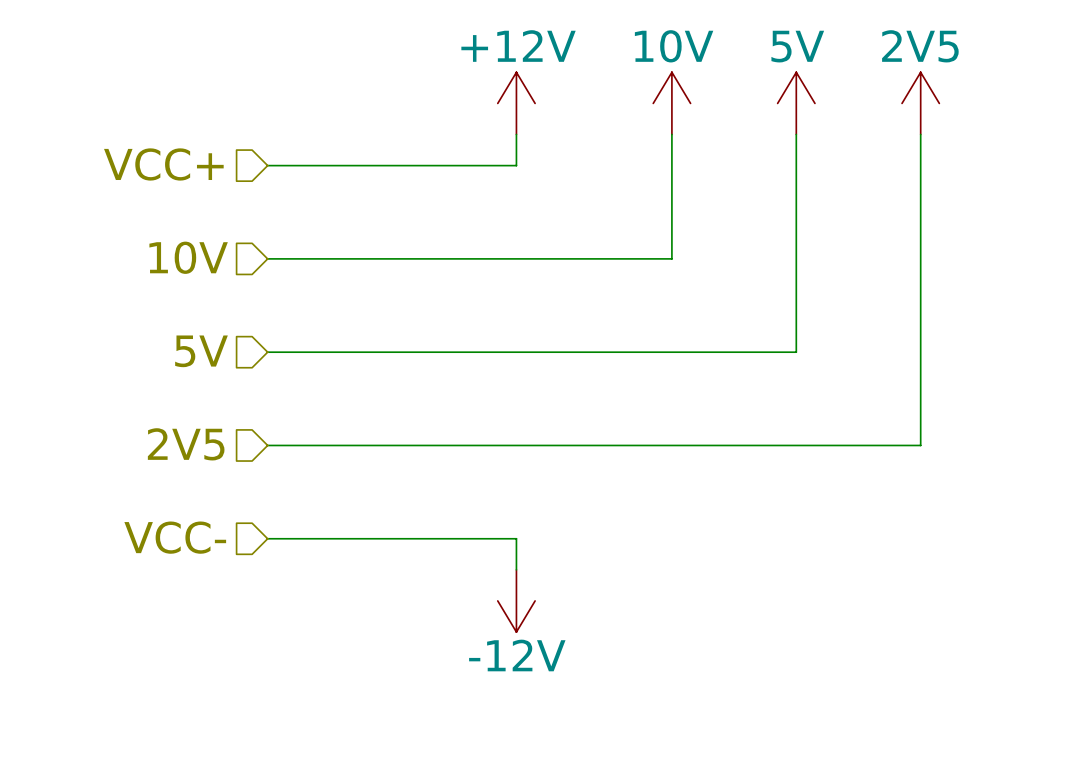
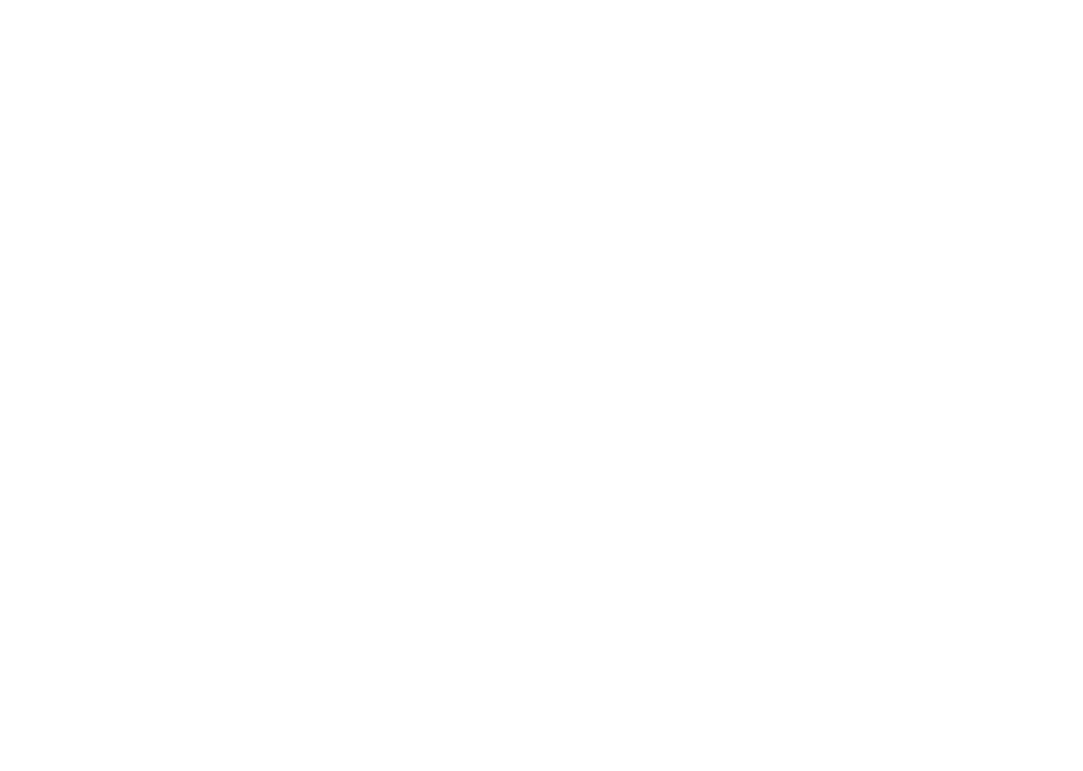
power symbol: +12V (516, 103) -> none
power symbol: 10V (671, 103) -> none
power symbol: 5V (796, 103) -> none
power symbol: 2V5 (920, 103) -> none
wire: (516, 134) (516, 165) (267, 165) -> none
wire: (671, 134) (671, 258) (267, 258) -> none
wire: (796, 134) (796, 352) (267, 352) -> none
wire: (920, 134) (920, 445) (267, 445) -> none
hierarchical label: VCC+ (163, 164) -> none
hierarchical label: 10V (188, 257) -> none
hierarchical label: 5V (201, 351) -> none
hierarchical label: 2V5 (186, 444) -> none
hierarchical label: VCC- (175, 537) -> none
wire: (267, 538) (516, 538) (516, 569) -> none
power symbol: -12V (516, 600) -> none

